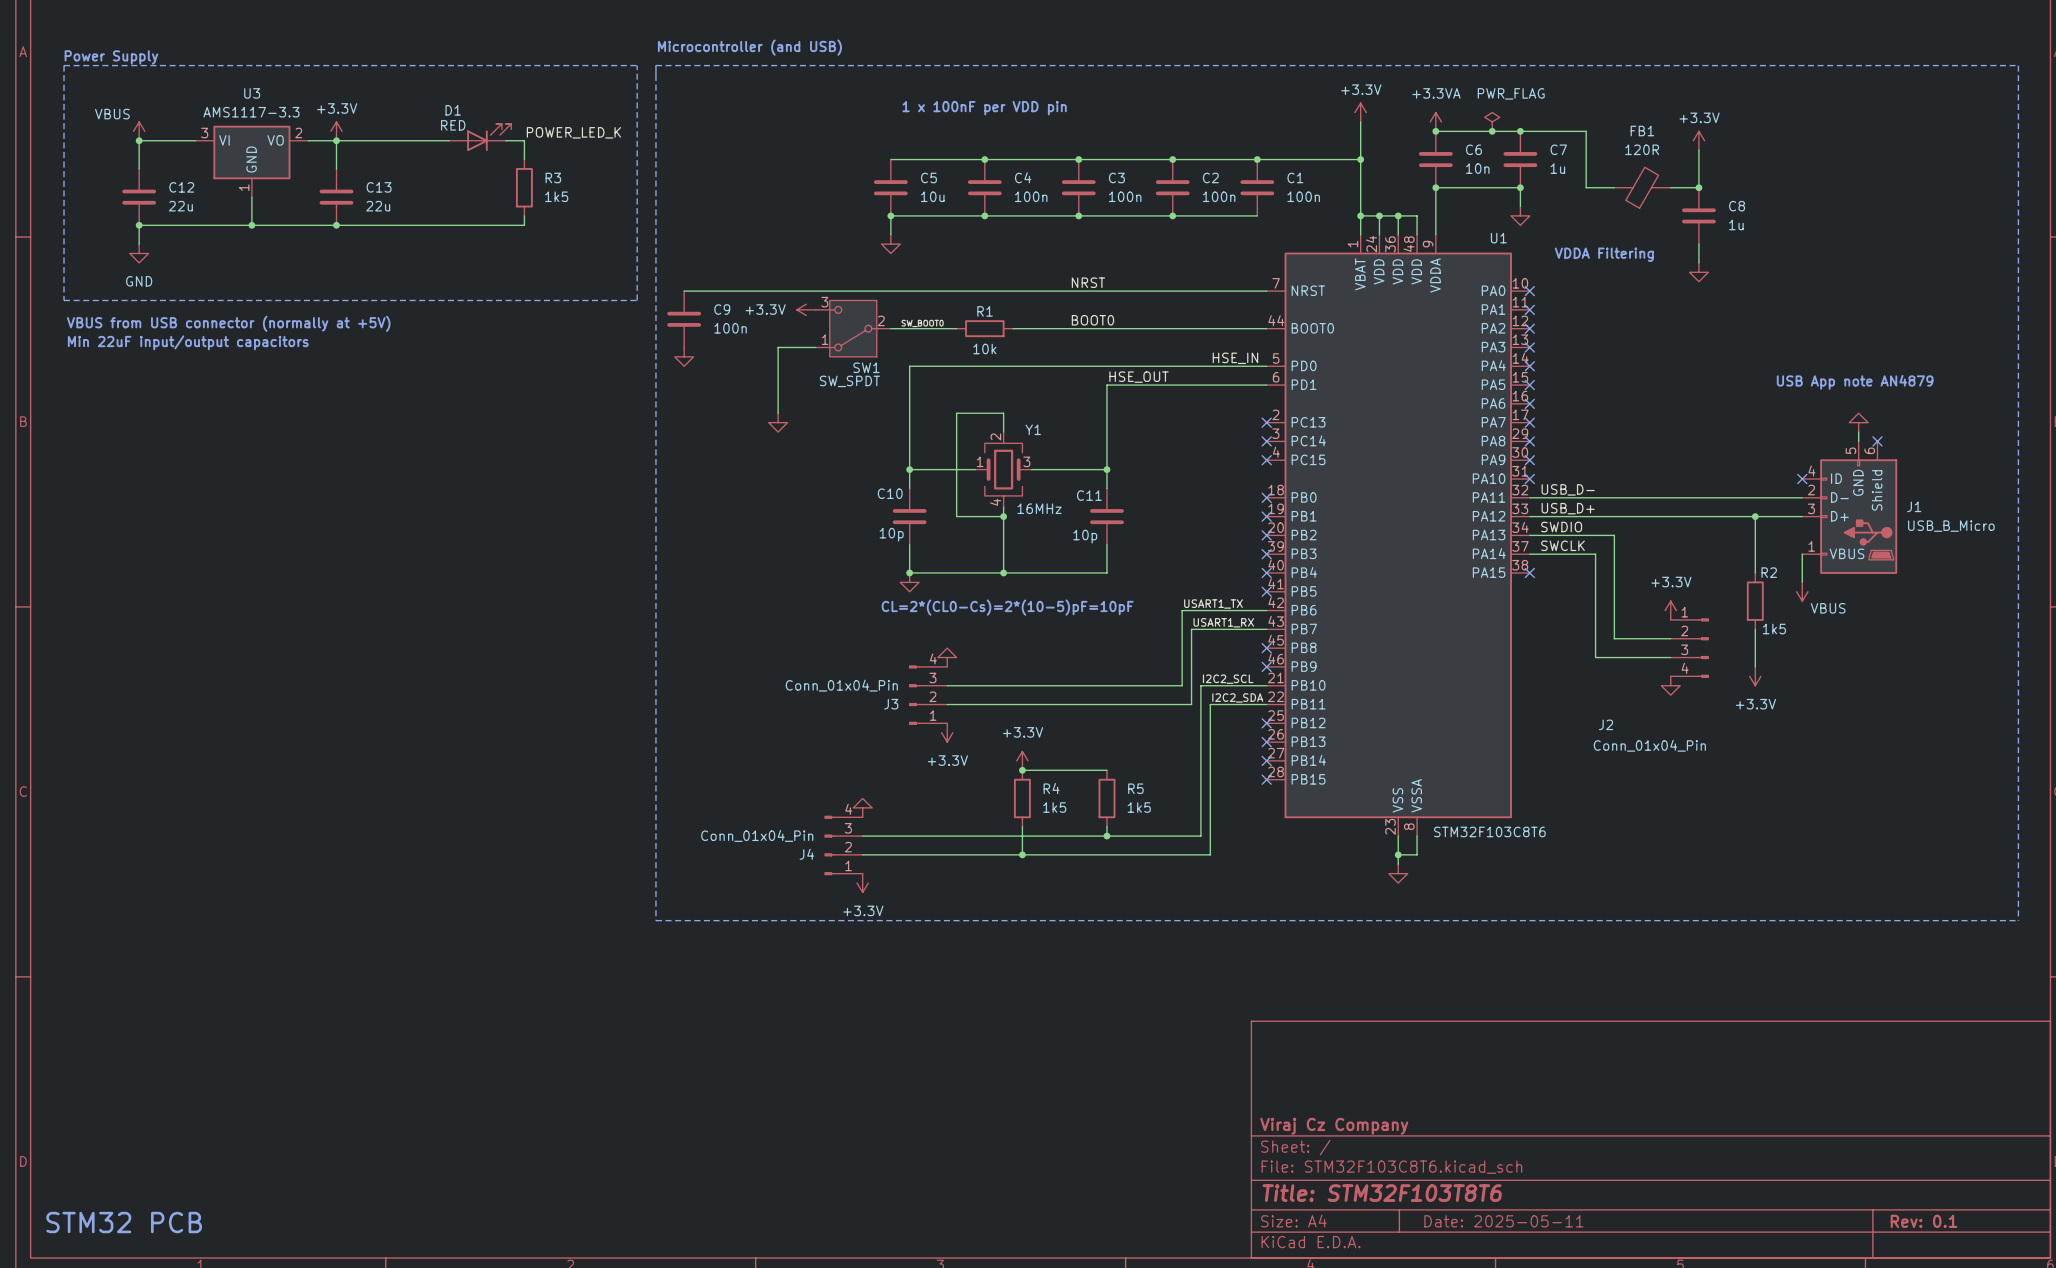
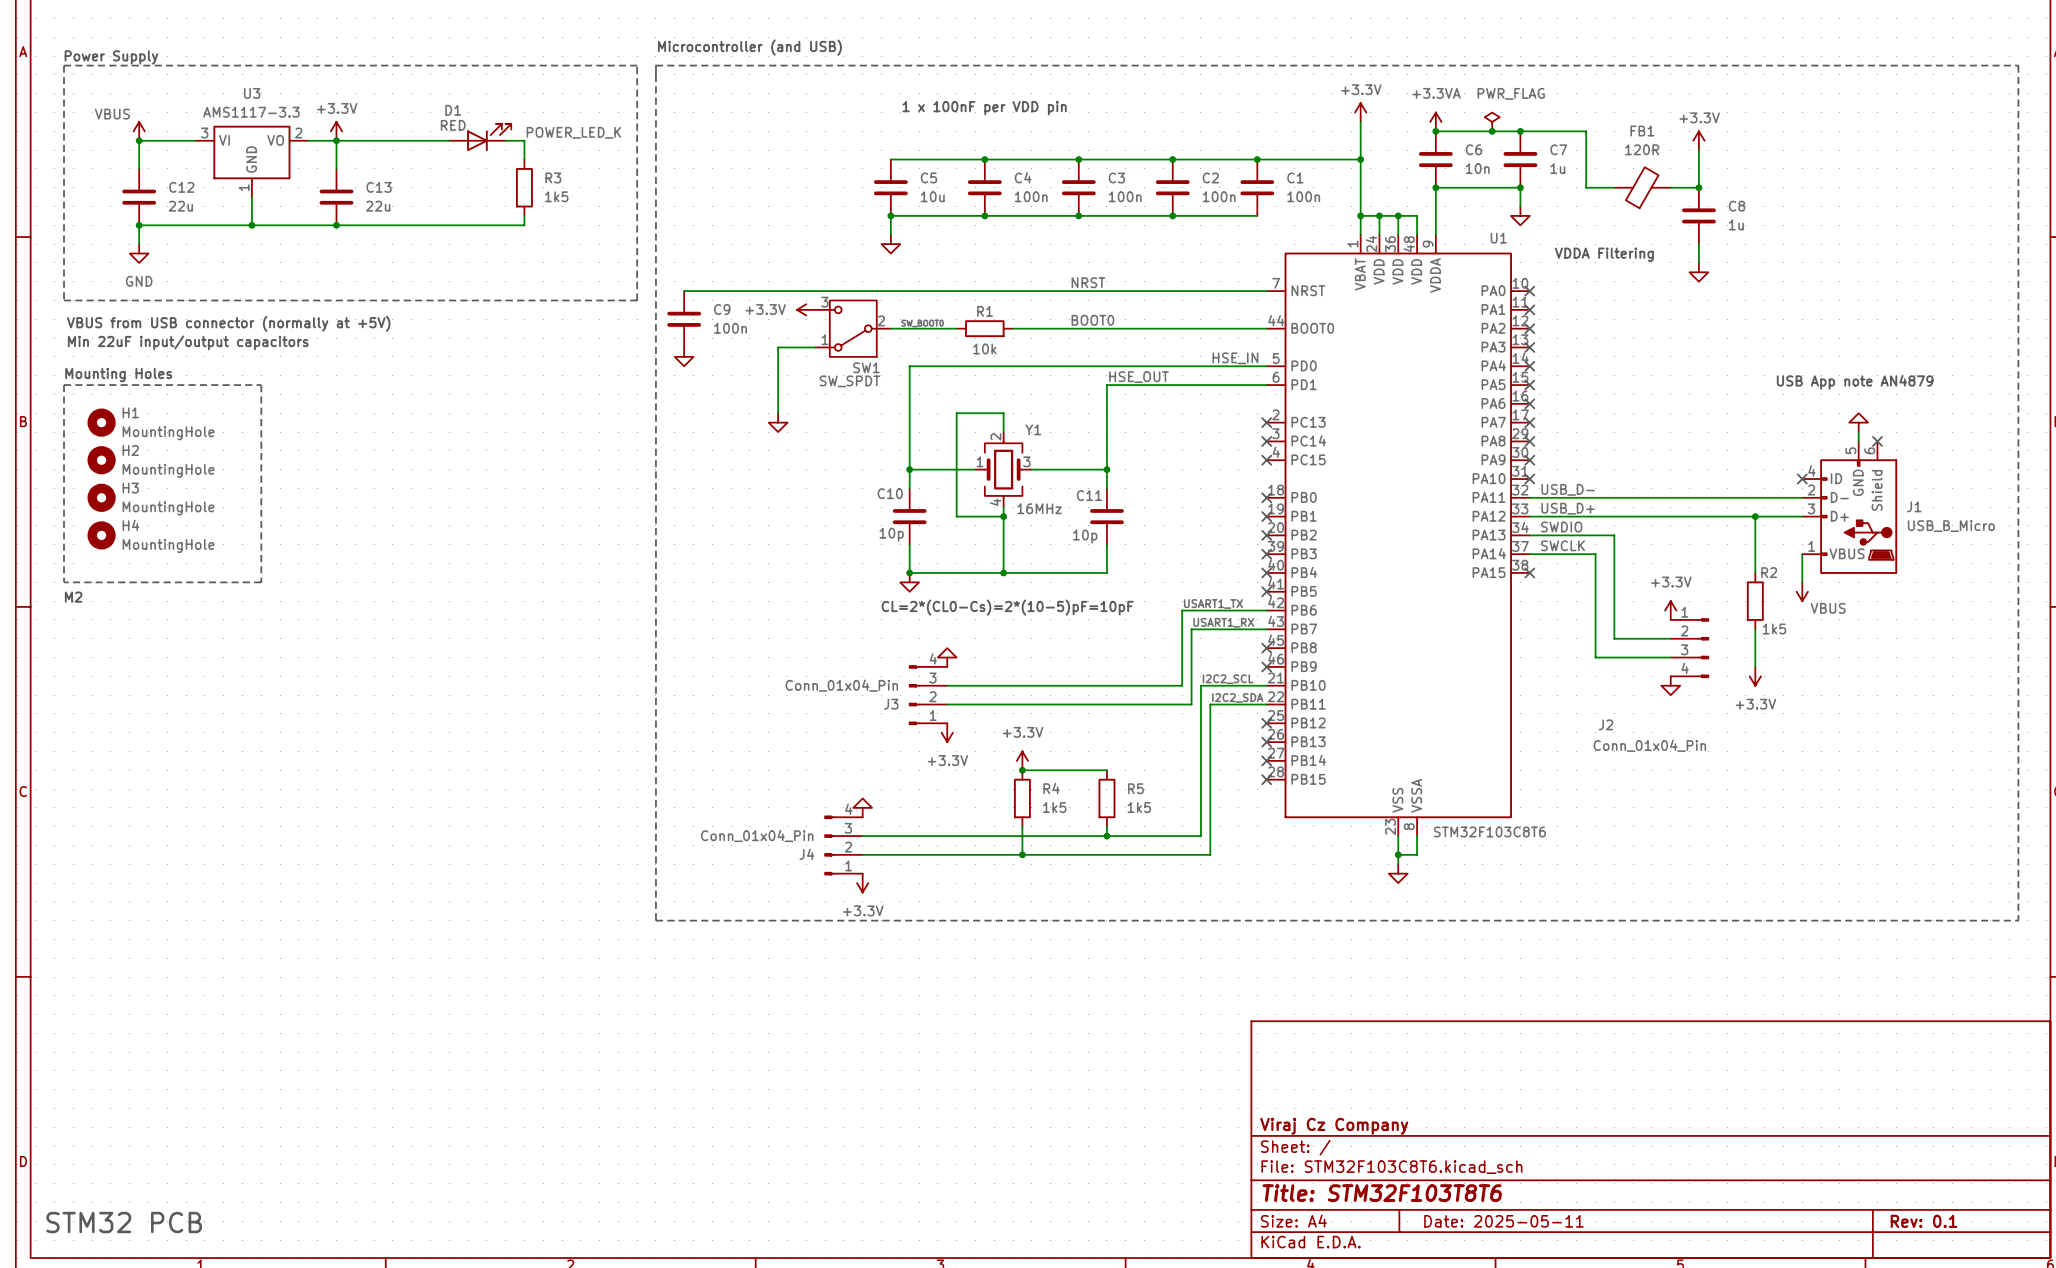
text: none -> Mounting Holes (118, 375)
line: none -> (64, 385) (261, 385) (261, 582) (64, 582) (64, 385)
H1: none -> MountingHole (101, 422)
H2: none -> MountingHole (101, 460)
H3: none -> MountingHole (101, 497)
H4: none -> MountingHole (101, 535)
text: none -> M2 (73, 597)

